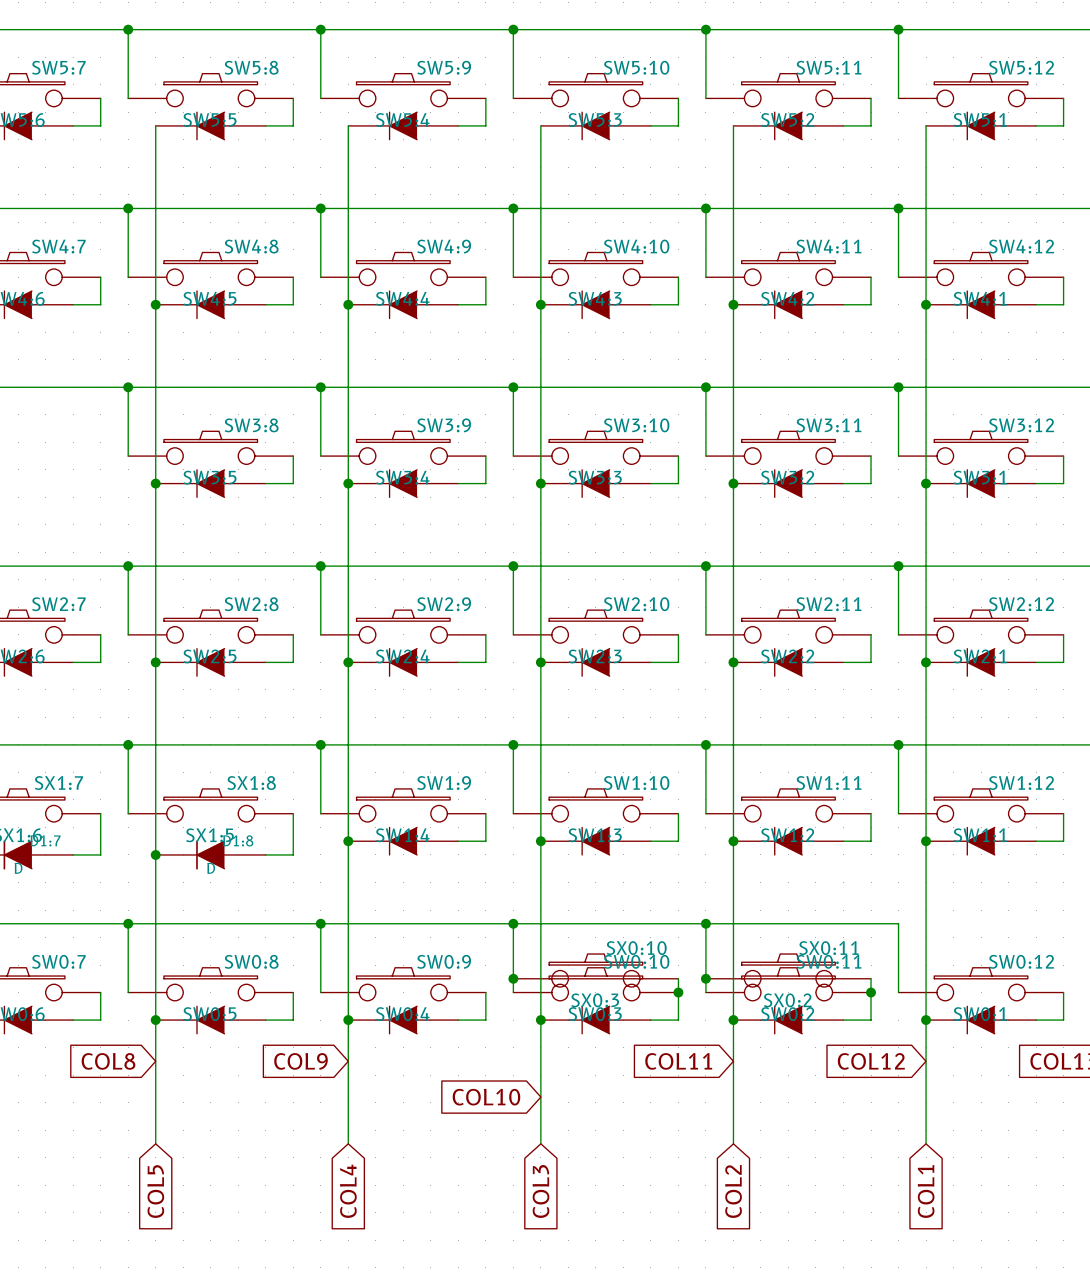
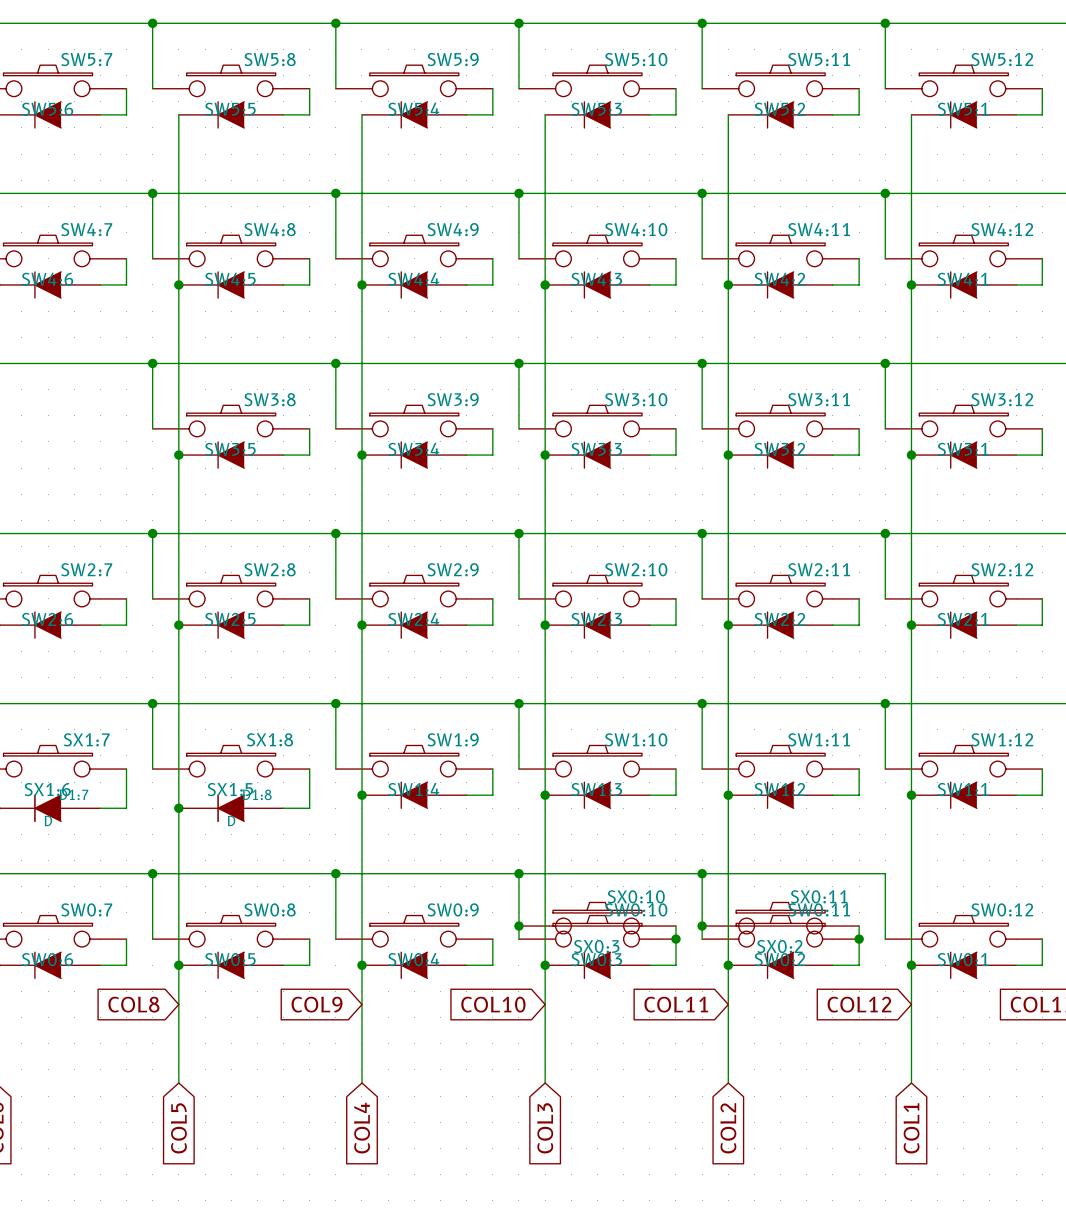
global label position: COL10 (486, 1097) -> COL10 (493, 1004)

